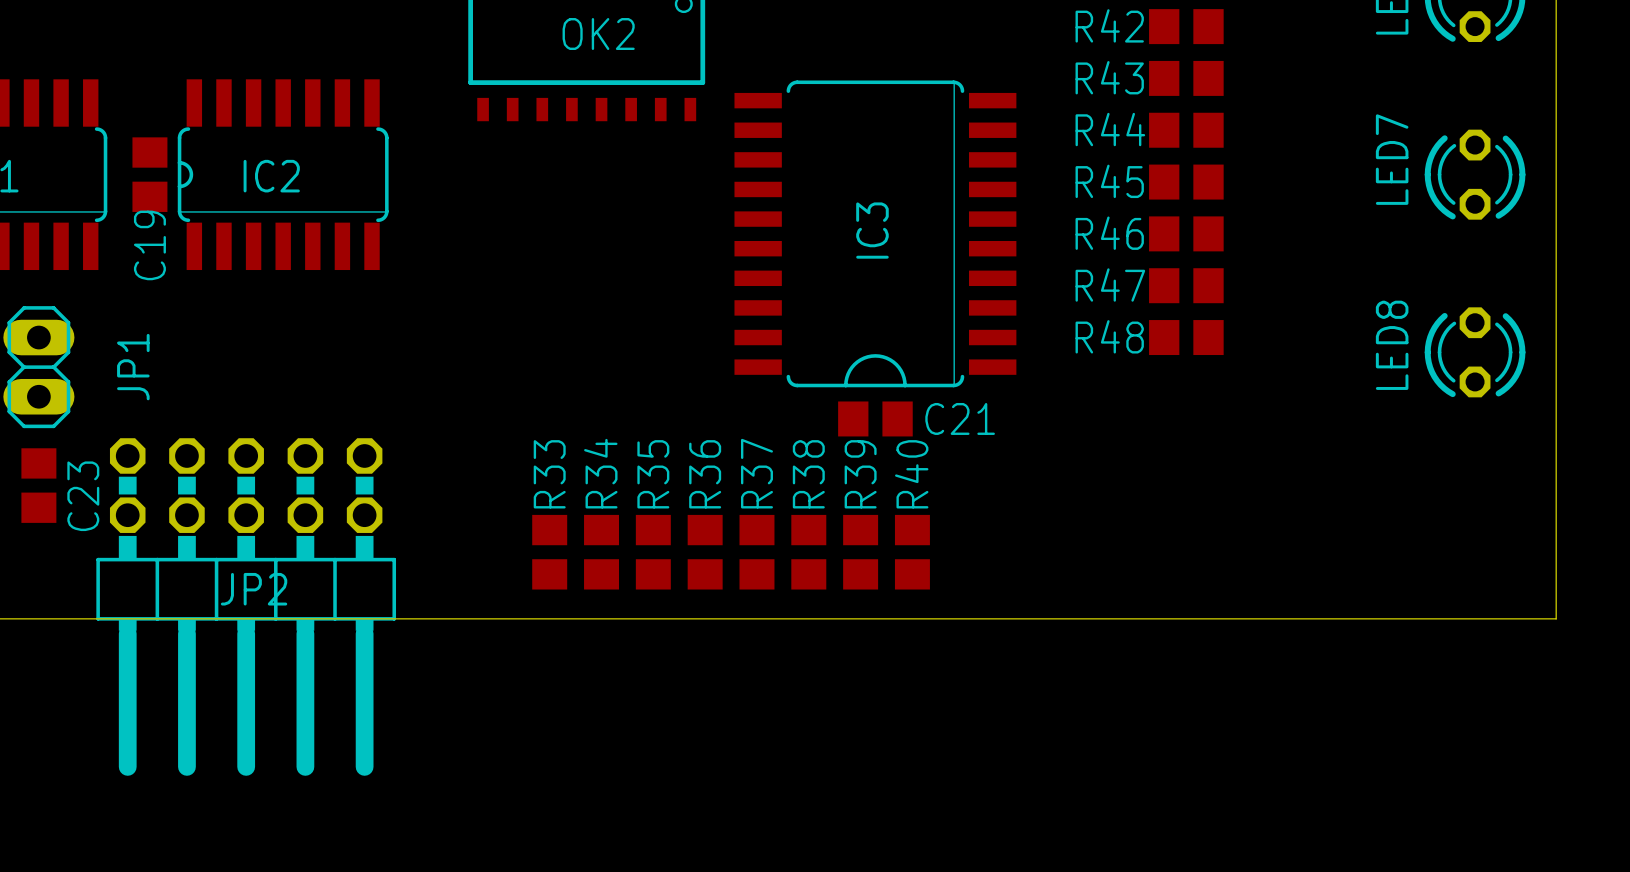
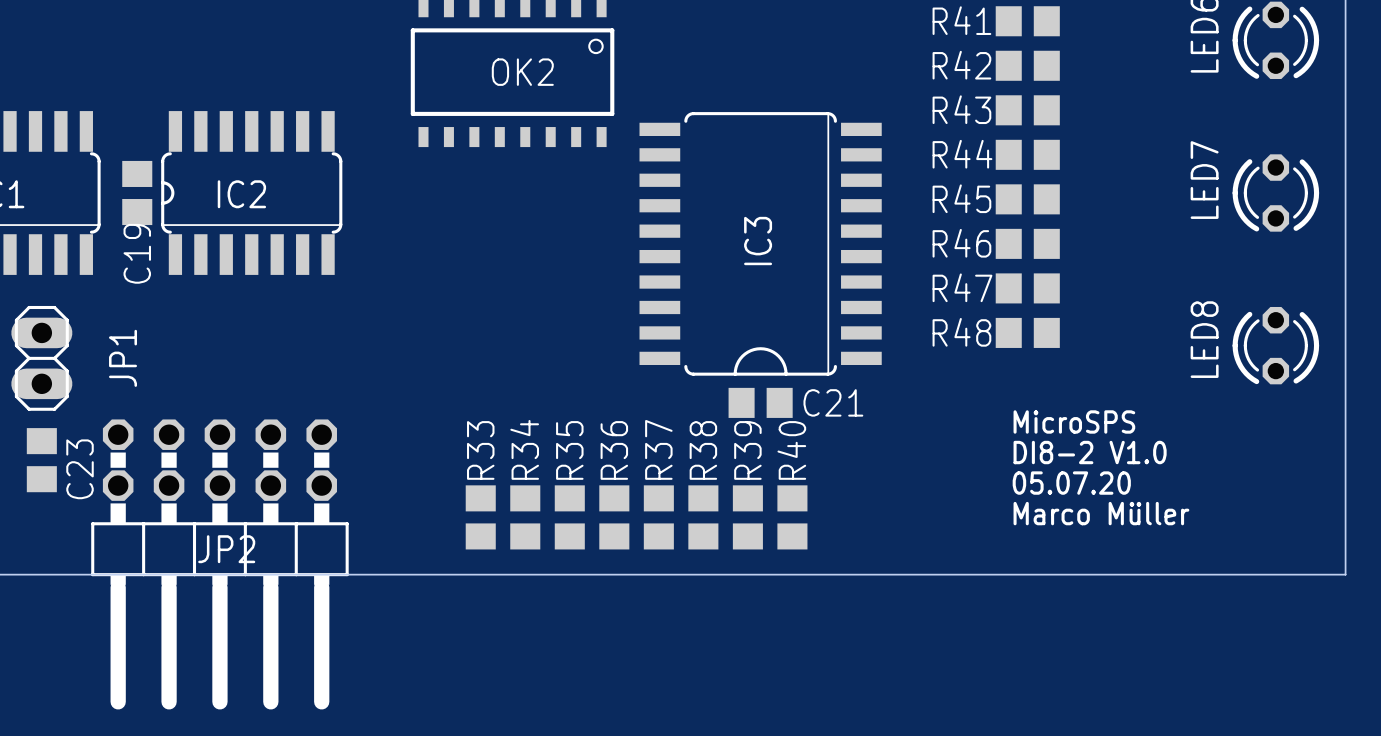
text: none -> MicroSPS (1074, 421)
text: none -> DI8-2 V1.0 (1090, 452)
text: none -> 05.07.20 (1071, 483)
text: none -> Marco Müller (1101, 513)

